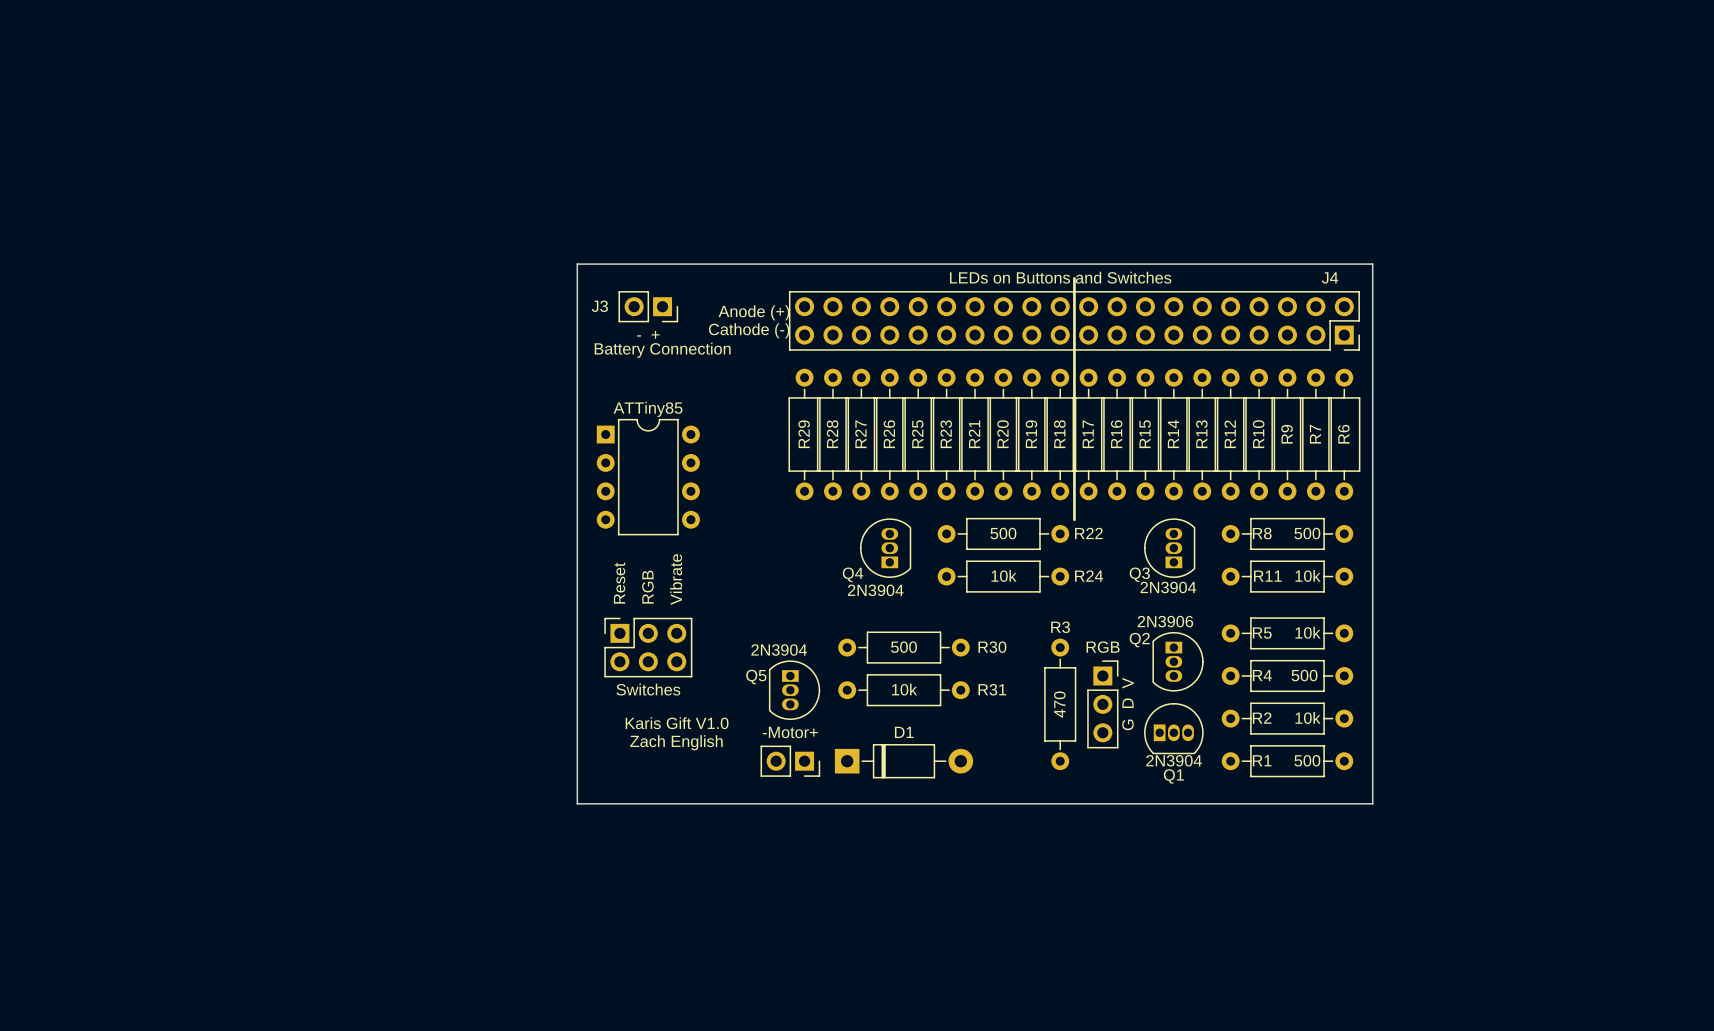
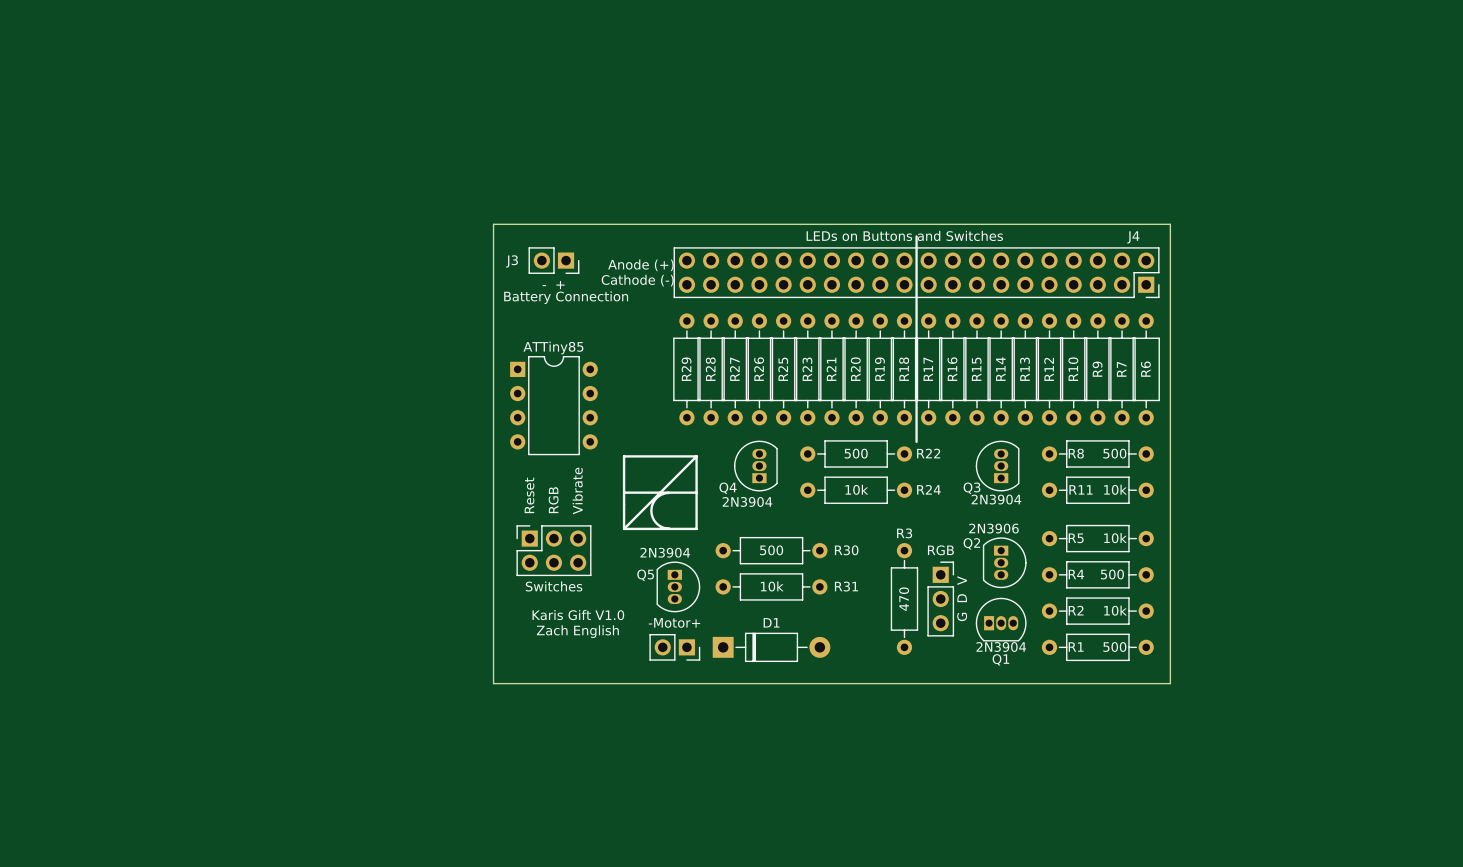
drawing: none -> [622, 455, 698, 531]

